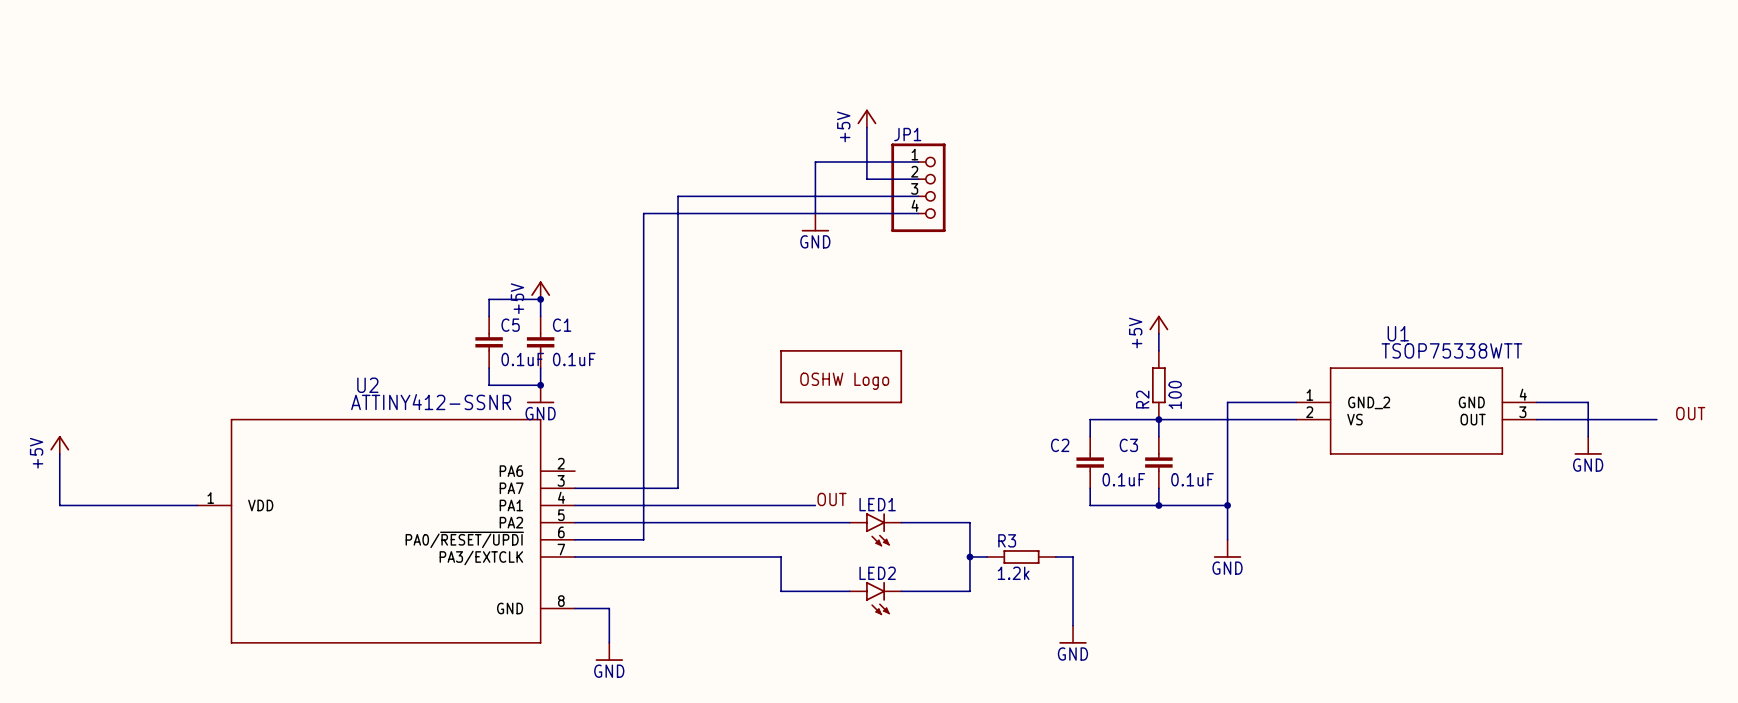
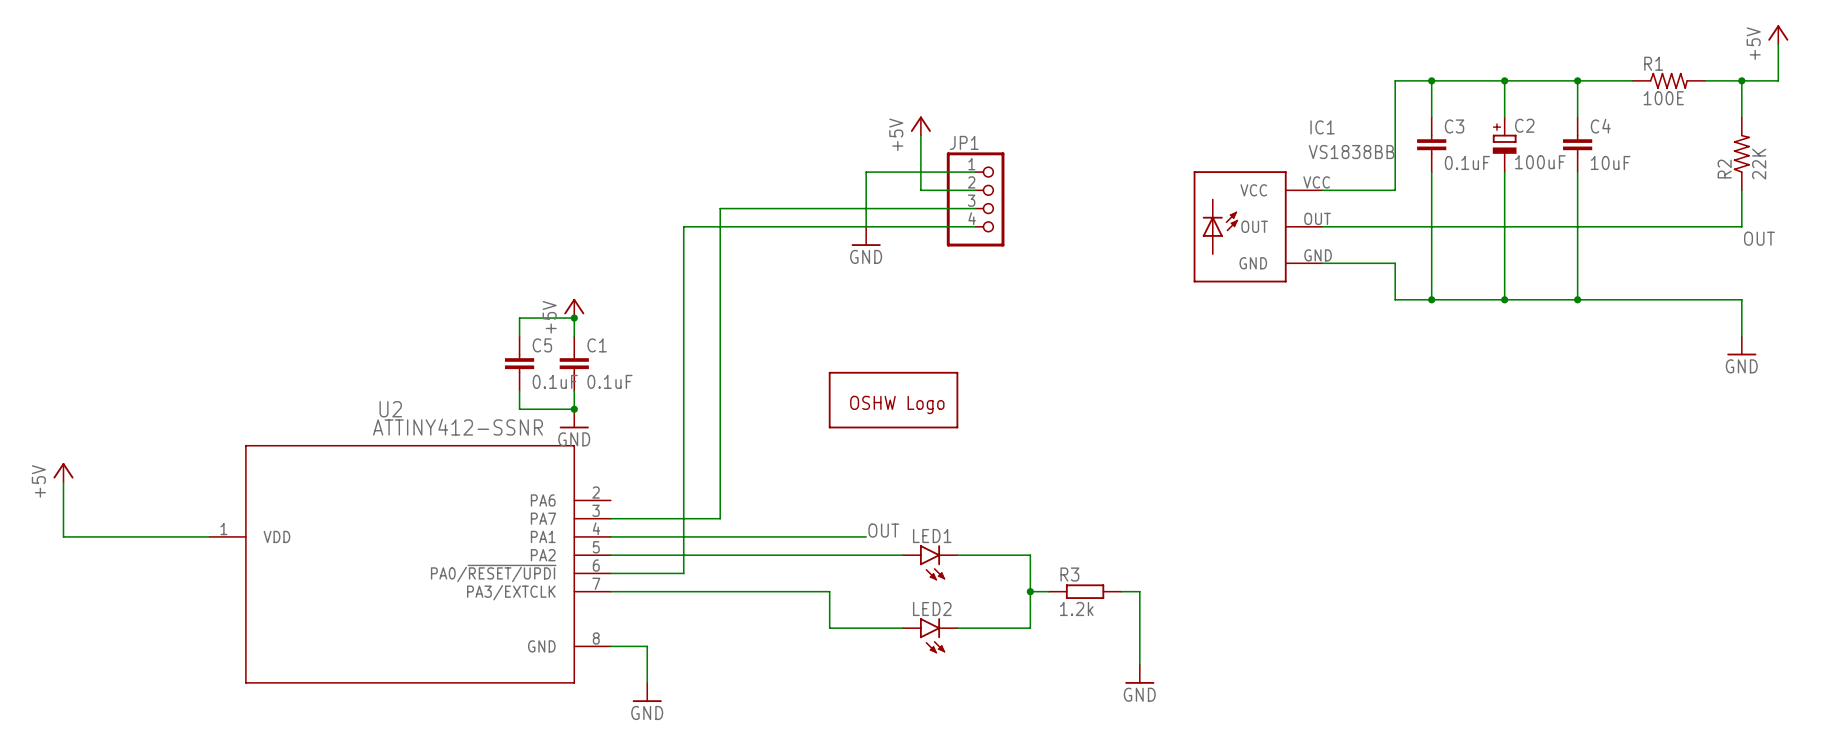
power symbol: none -> +5V (1778, 34)
wire: none -> (1778, 44) (1778, 80) (1705, 80)
wire: none -> (1431, 80) (1431, 117)
junction: none -> (1431, 80)
wire: none -> (1504, 80) (1504, 117)
junction: none -> (1504, 80)
wire: none -> (1577, 80) (1577, 117)
junction: none -> (1577, 80)
wire: none -> (1632, 80) (1395, 80) (1395, 190) (1322, 190)
R1: none -> 100E (1668, 80)
wire: none -> (1741, 80) (1741, 117)
junction: none -> (1741, 80)
C4: none -> 10uF (1577, 144)
wire: none -> (1431, 172) (1431, 299)
wire: none -> (1504, 172) (1504, 299)
wire: none -> (1577, 172) (1577, 299)
wire: none -> (1741, 190) (1741, 226) (1322, 226)
IC1: none -> VS1838BB (1257, 226)
label: none -> OUT (1759, 238)
wire: none -> (1322, 263) (1395, 263) (1395, 299) (1741, 299) (1741, 336)
junction: none -> (1431, 299)
junction: none -> (1504, 299)
junction: none -> (1577, 299)
power symbol: +5V (1158, 324) -> none
wire: (1158, 333) (1158, 350) -> none
R2 symbol: [1152, 350, 1166, 420] -> [1733, 117, 1750, 191]
R2 value: 100 (1175, 394) -> 22K (1759, 164)
wire: (1296, 402) (1227, 402) (1227, 539) -> none
wire: (1536, 402) (1588, 402) (1588, 436) -> none
U1: TSOP75338WTT (1416, 411) -> none
label: OUT (1690, 413) -> none
wire: (1158, 419) (1158, 436) -> none
junction: (1158, 419) -> none
wire: (1296, 419) (1090, 419) (1090, 436) -> none
wire: (1536, 419) (1656, 419) -> none
C2 symbol: [1076, 436, 1104, 489] -> [1492, 117, 1517, 173]
C2 name position: C2 (1060, 445) -> C2 (1524, 125)
C3 name position: C3 (1128, 445) -> C3 (1454, 126)
power symbol position: GND (1588, 445) -> GND (1741, 345)
C3 position: (1158, 462) -> (1431, 144)
C2 value: 0.1uF (1123, 479) -> 100uF (1540, 162)
wire: (1090, 488) (1090, 505) (1227, 505) -> none
wire: (1158, 488) (1158, 505) -> none
junction: (1158, 505) -> none
junction: (1227, 505) -> none
power symbol: GND (1227, 548) -> none

